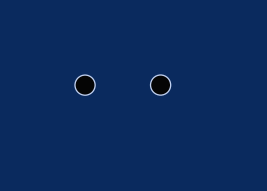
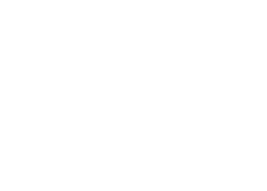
part: (122, 85) -> none

